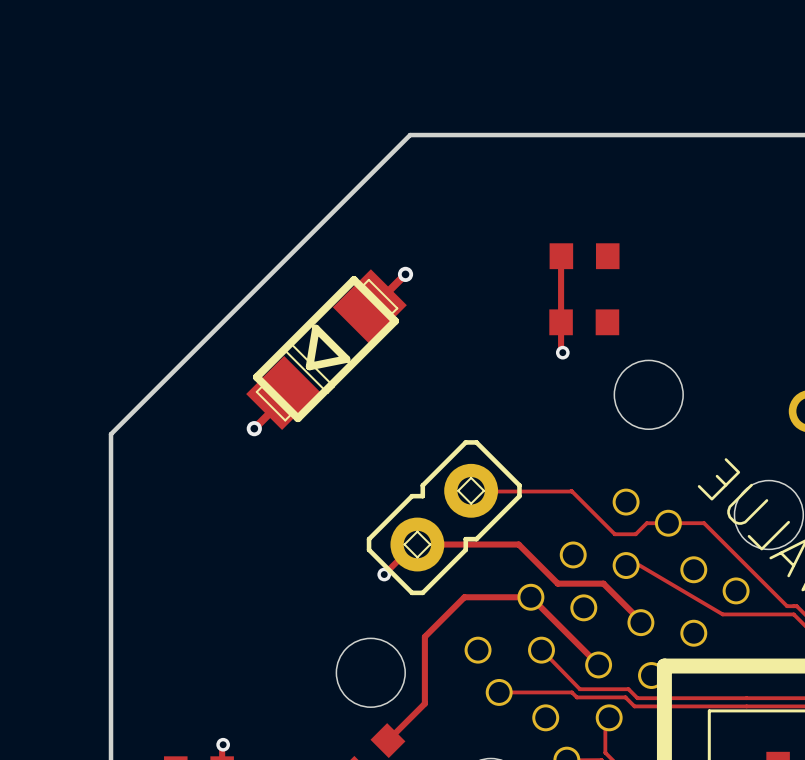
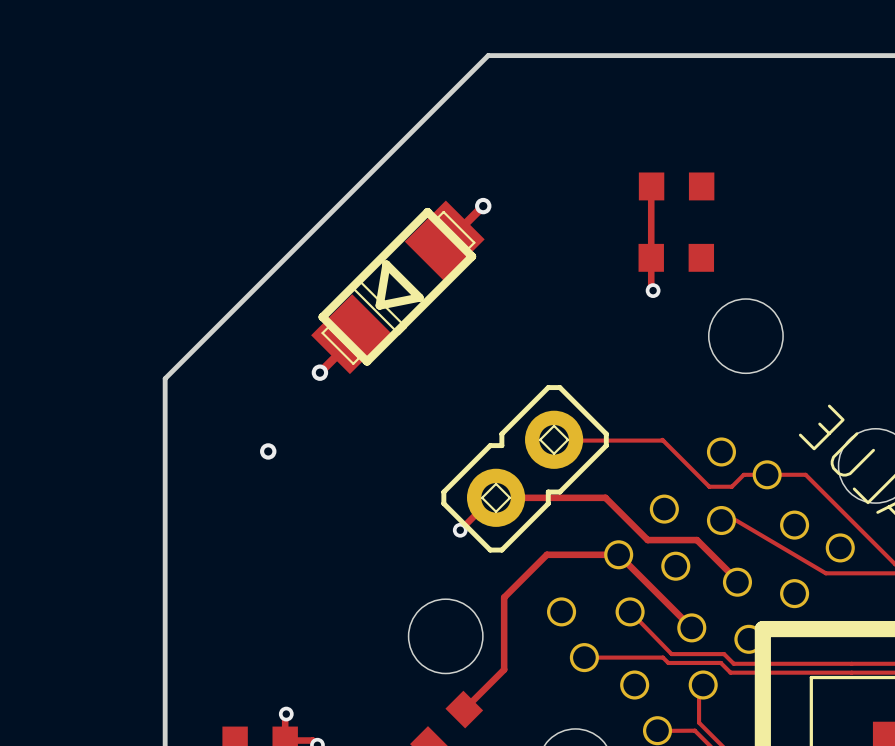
via: none -> (268, 451)

